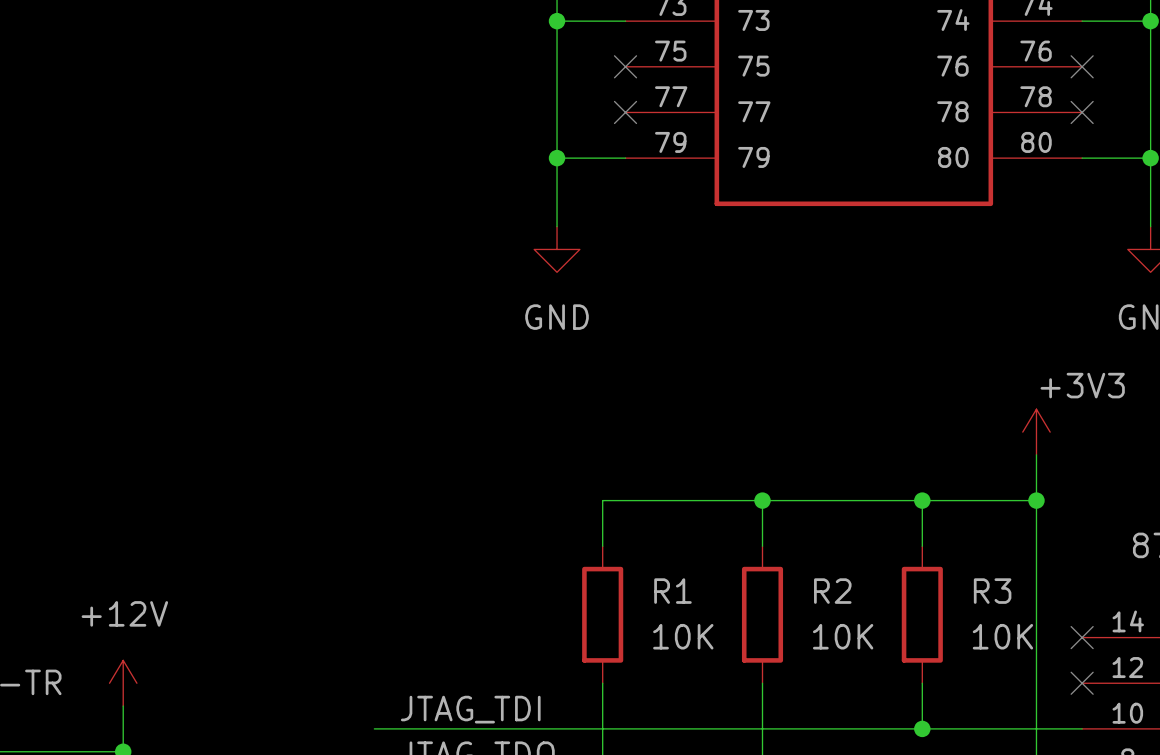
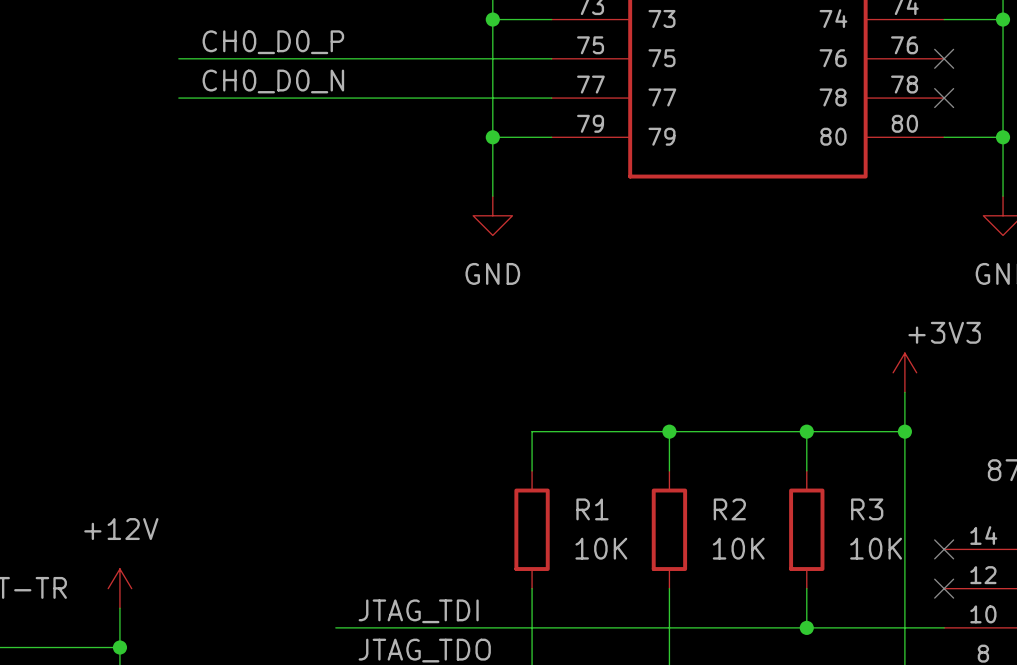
label: none -> CH0_D0_P (273, 42)
wire: none -> (178, 58) (551, 58)
no-connect mark: (625, 66) -> none
label: none -> CH0_D0_N (273, 81)
wire: none -> (178, 98) (551, 98)
no-connect mark: (625, 112) -> none

